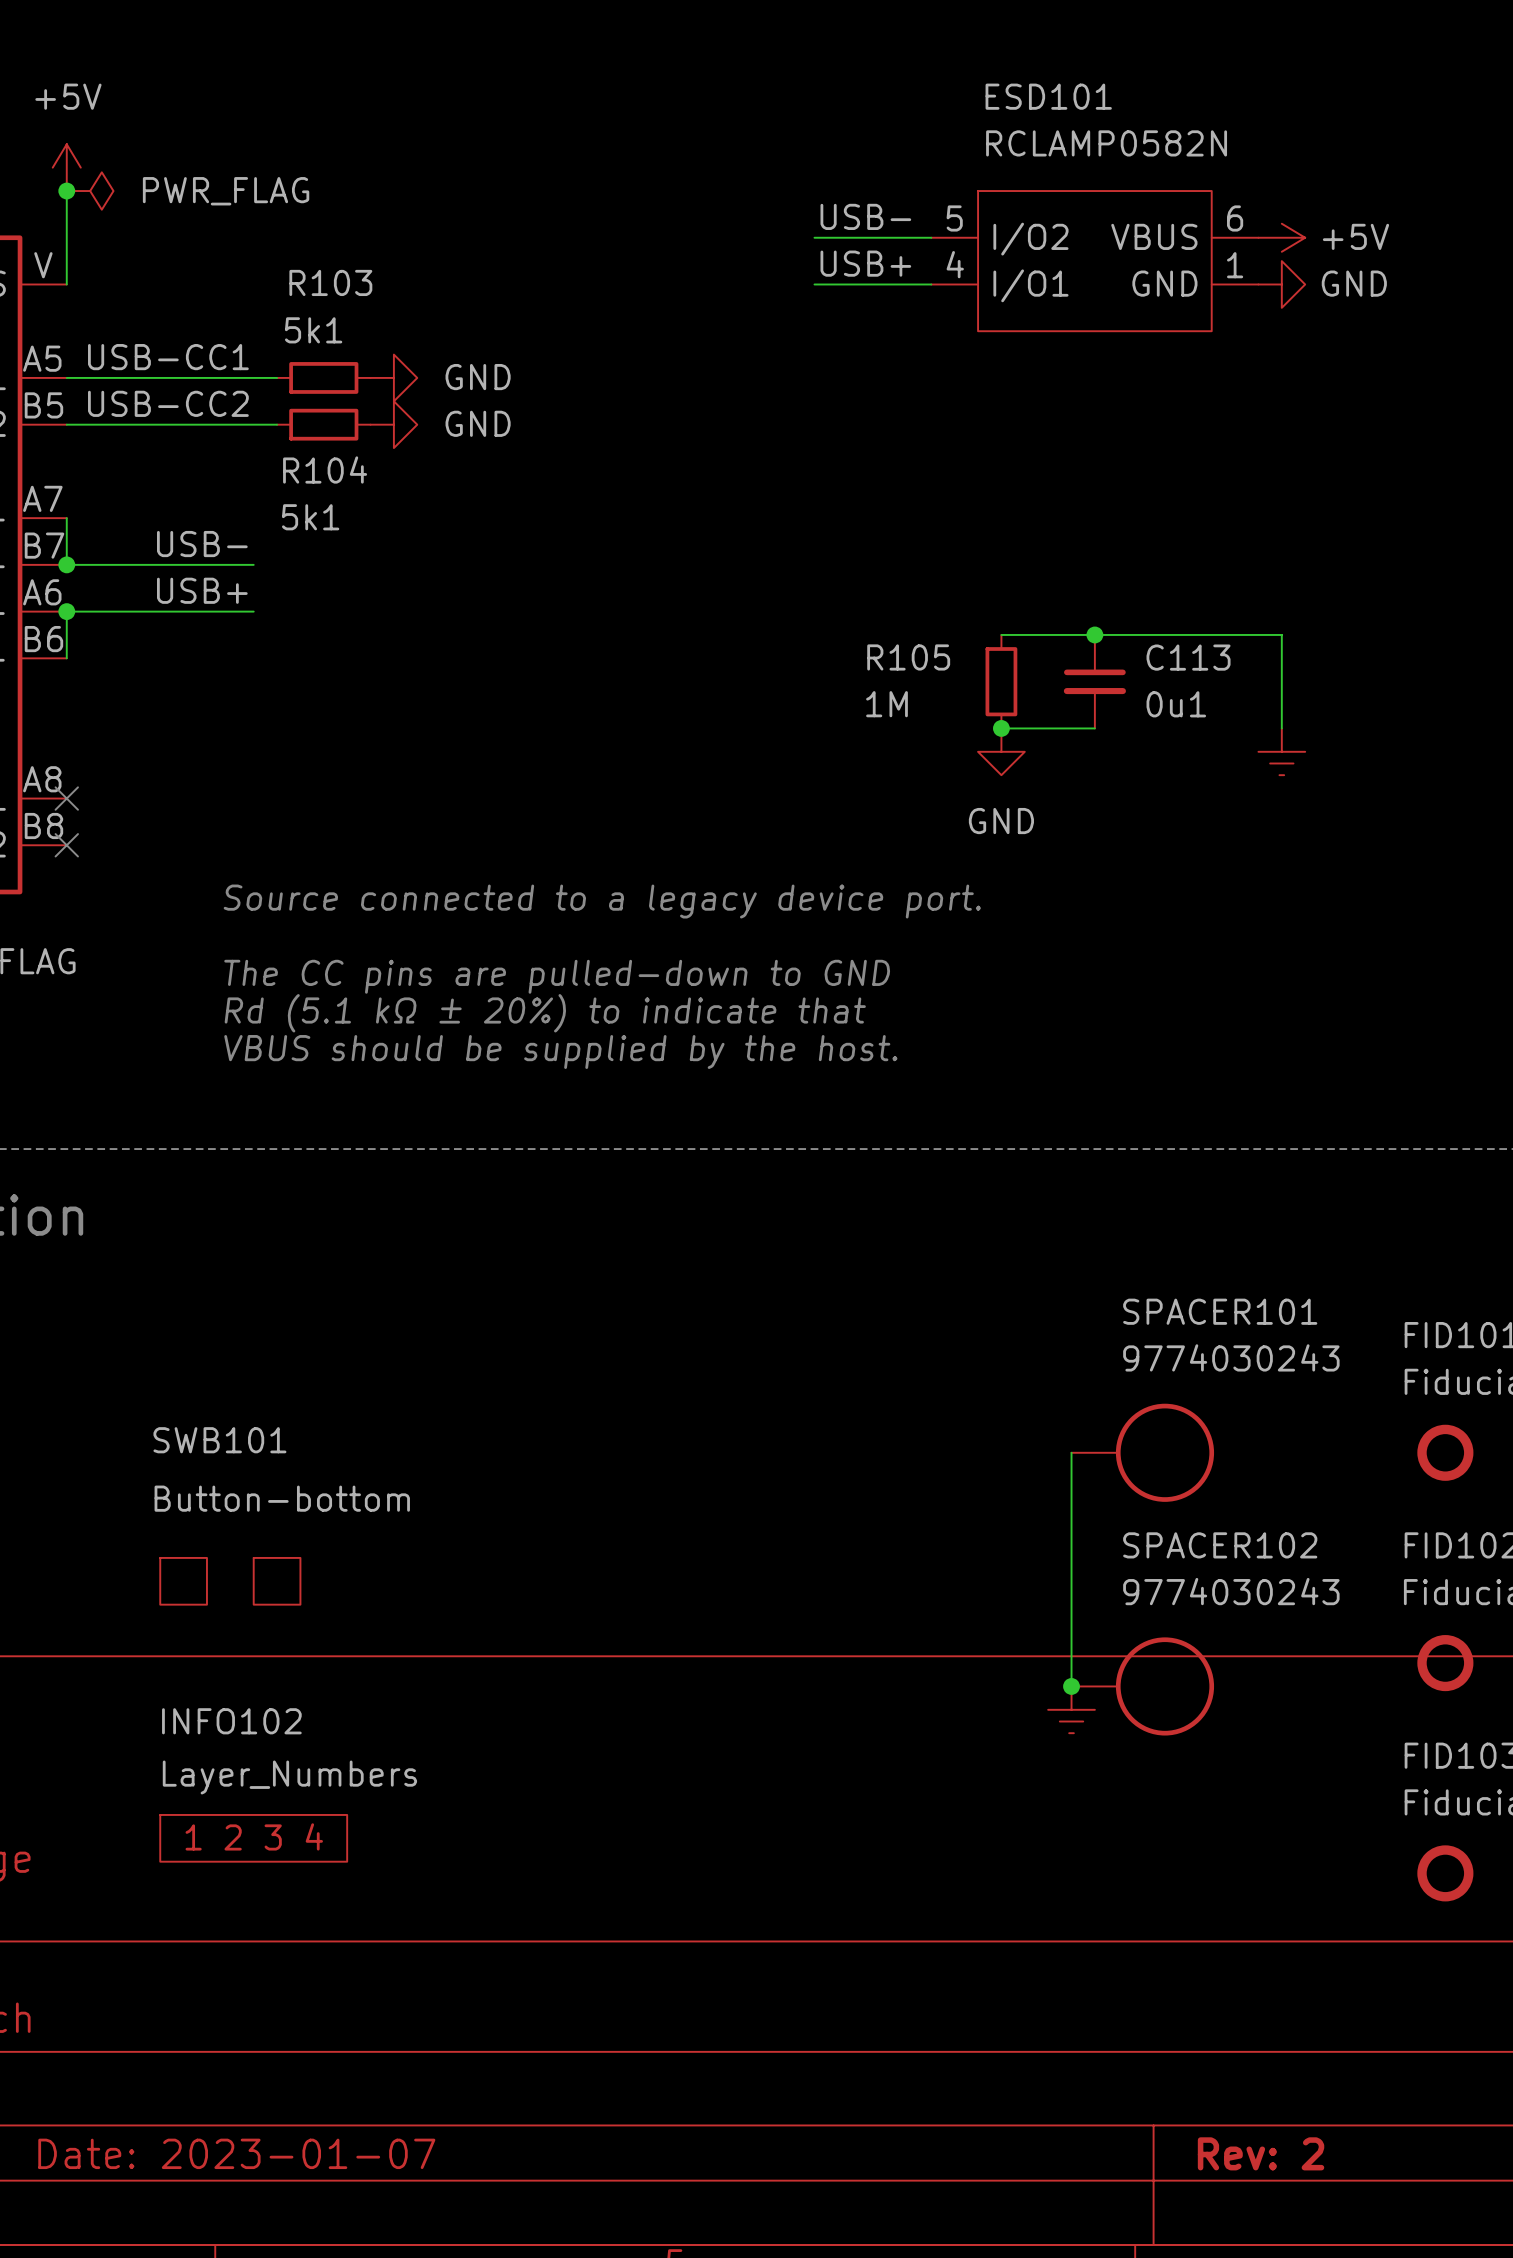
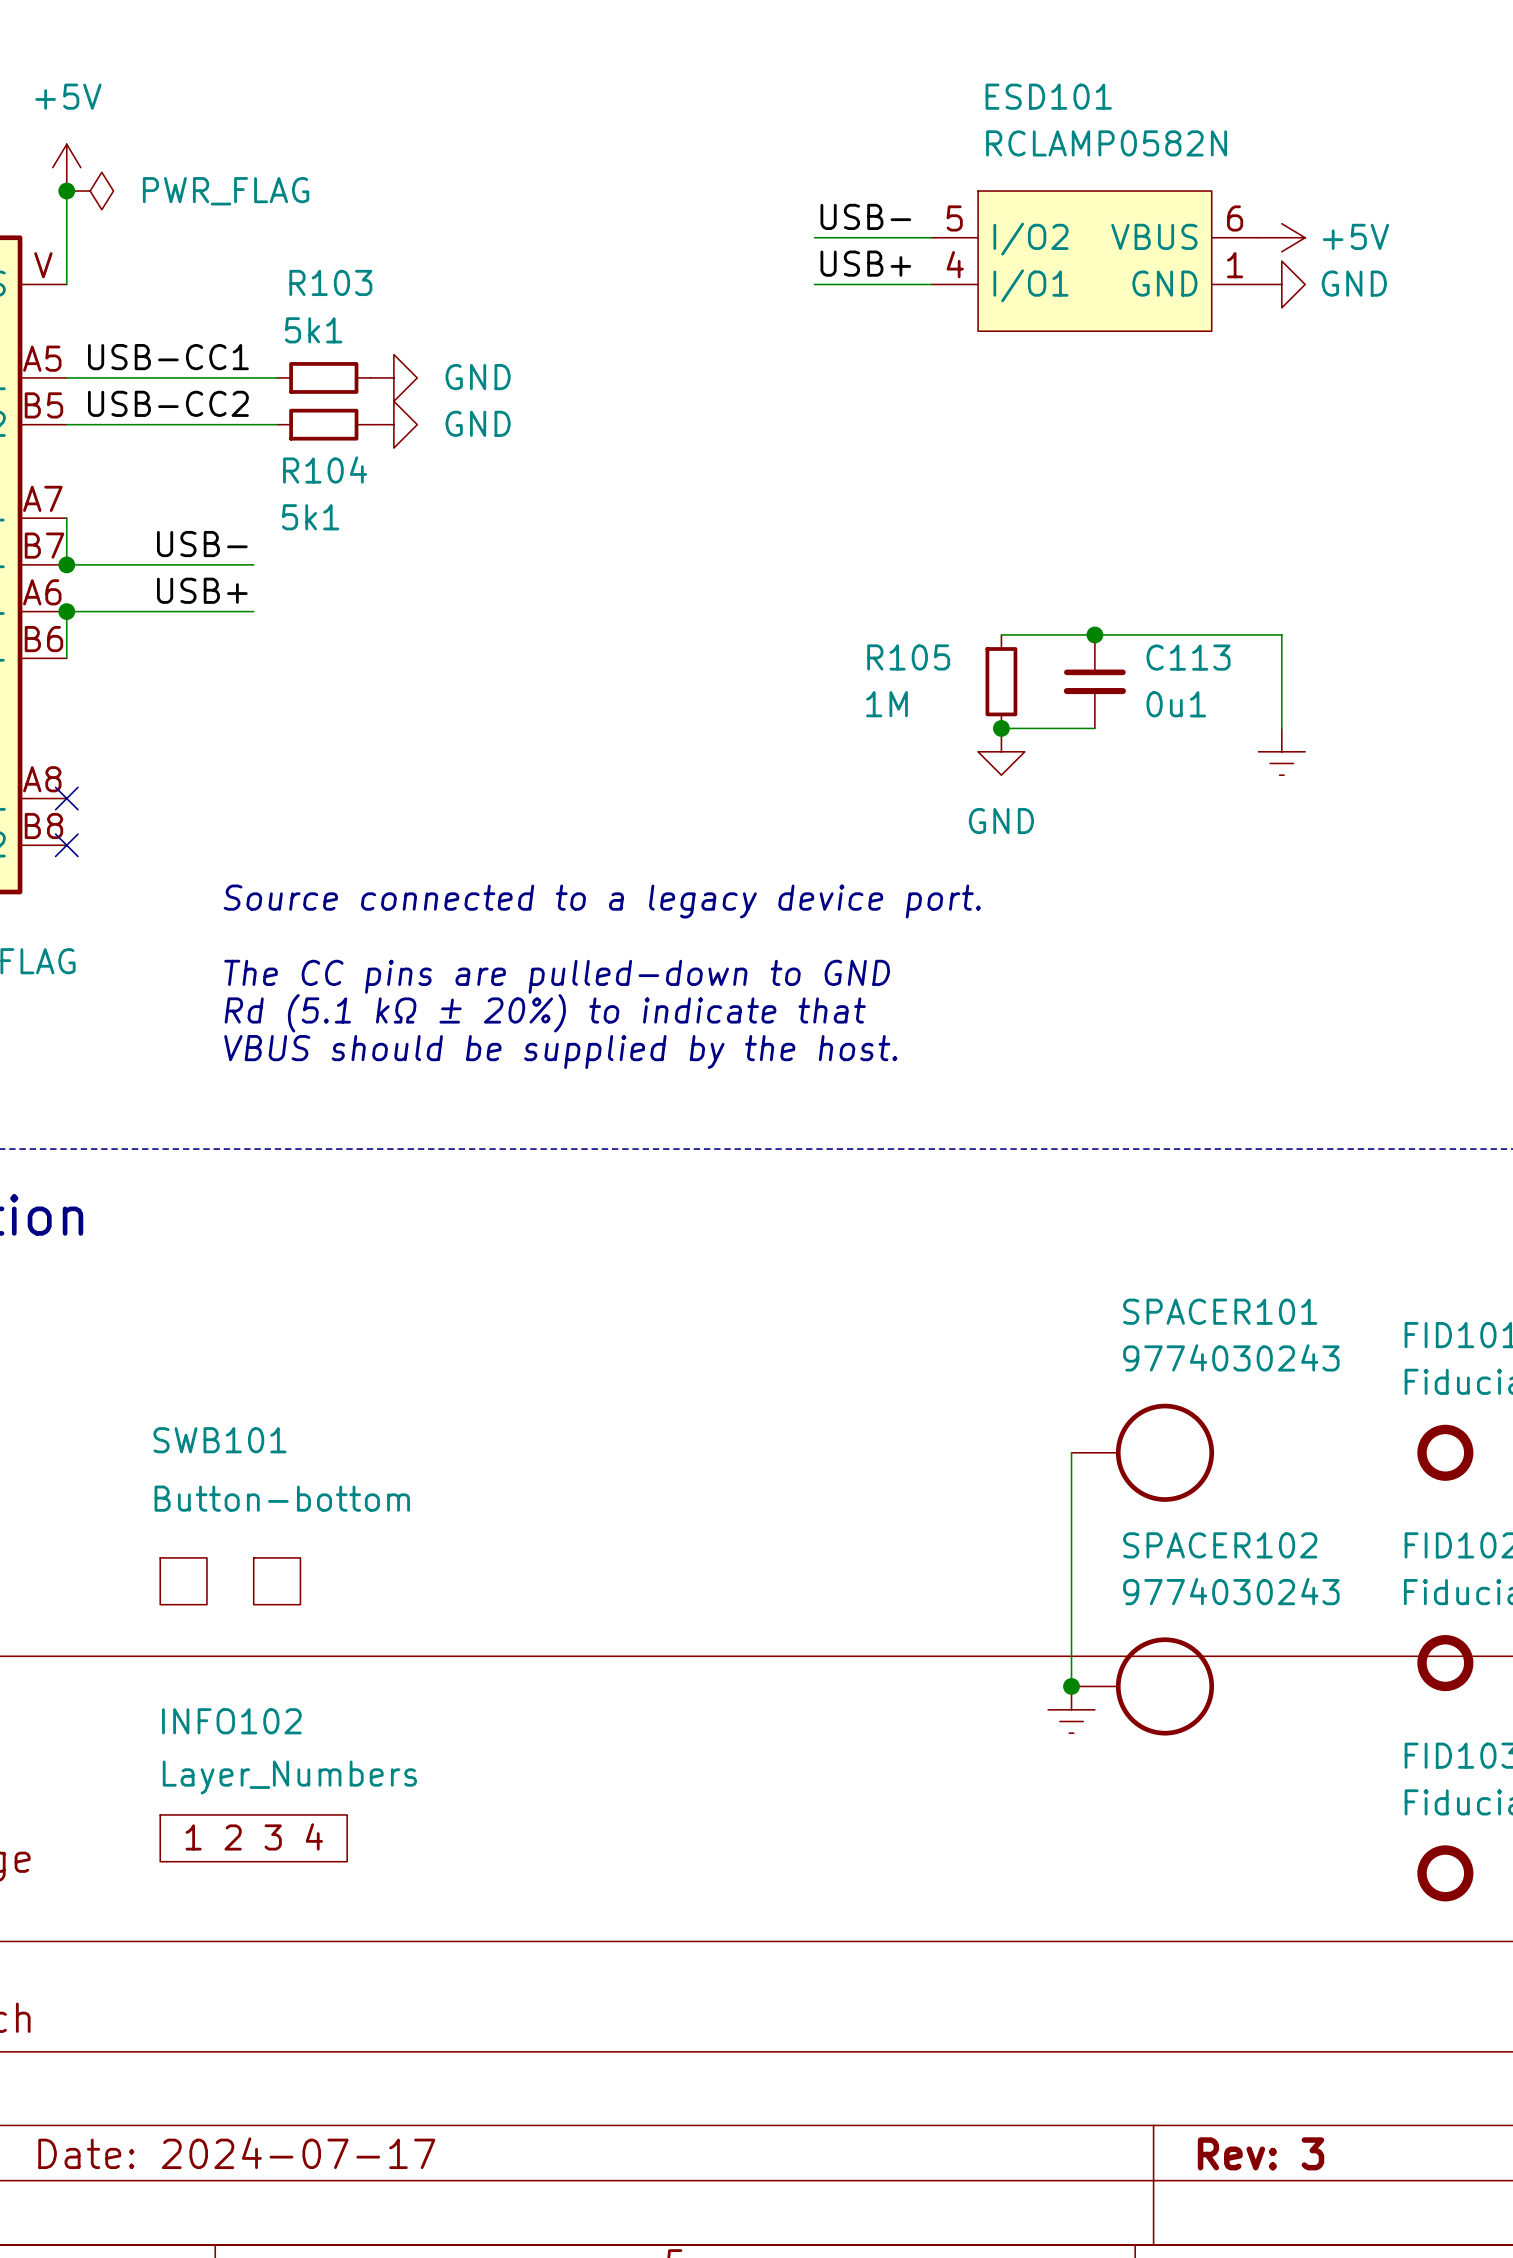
title block: Date: 2023-01-07 (236, 2153) -> Date: 2024-07-17 (236, 2153)
title block: Rev: 2 (1261, 2153) -> Rev: 3 (1261, 2153)

